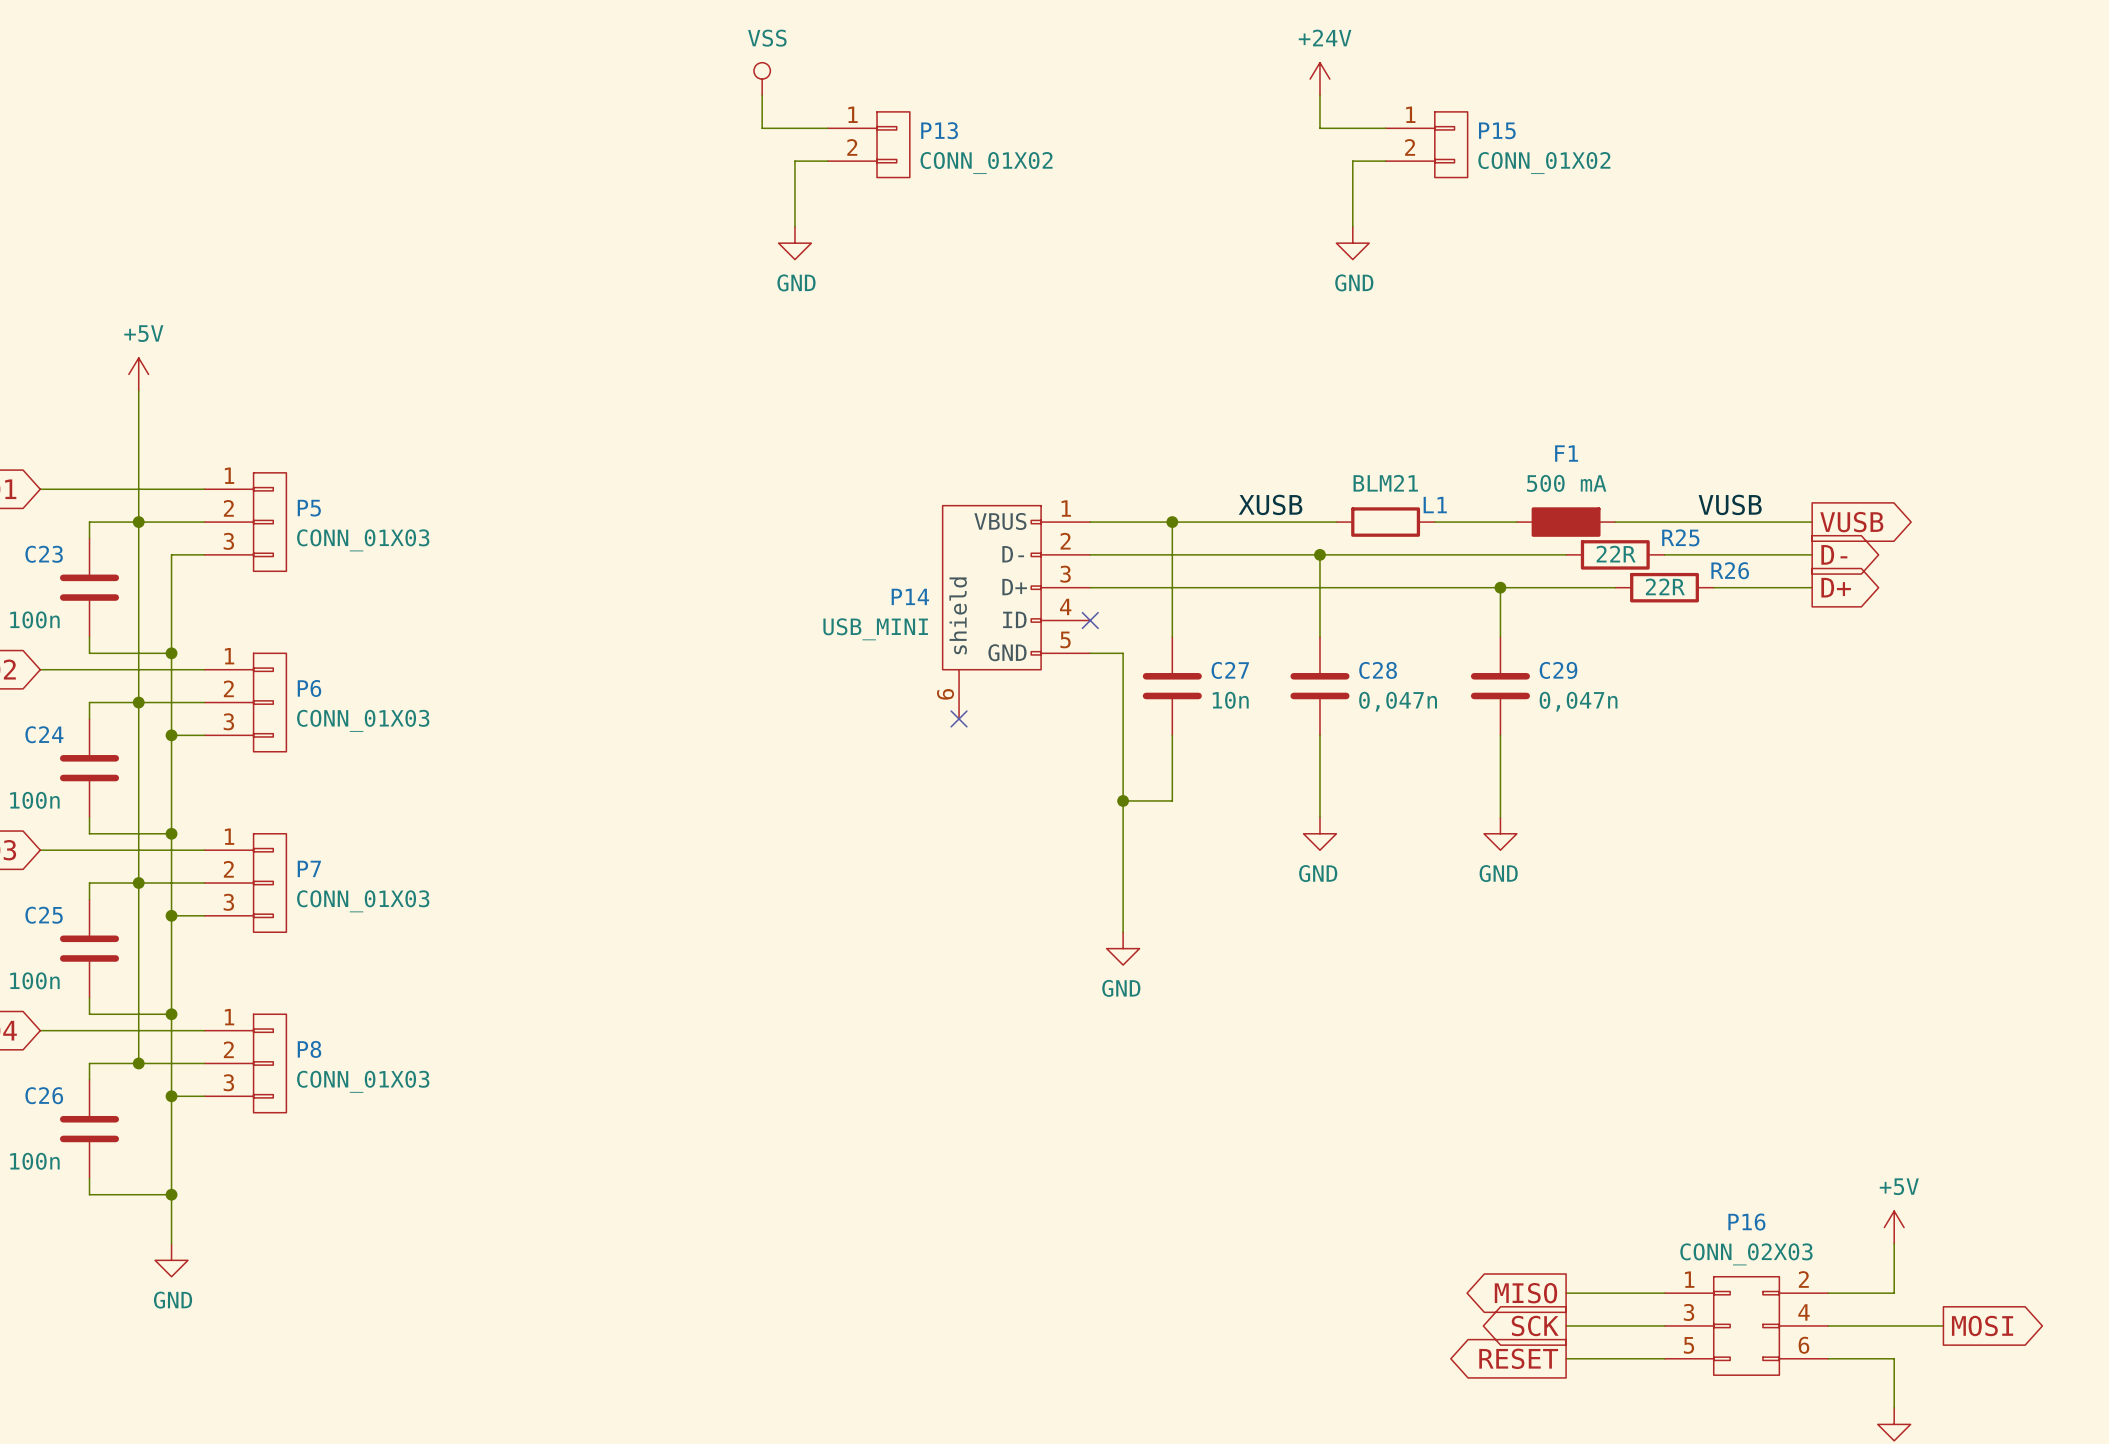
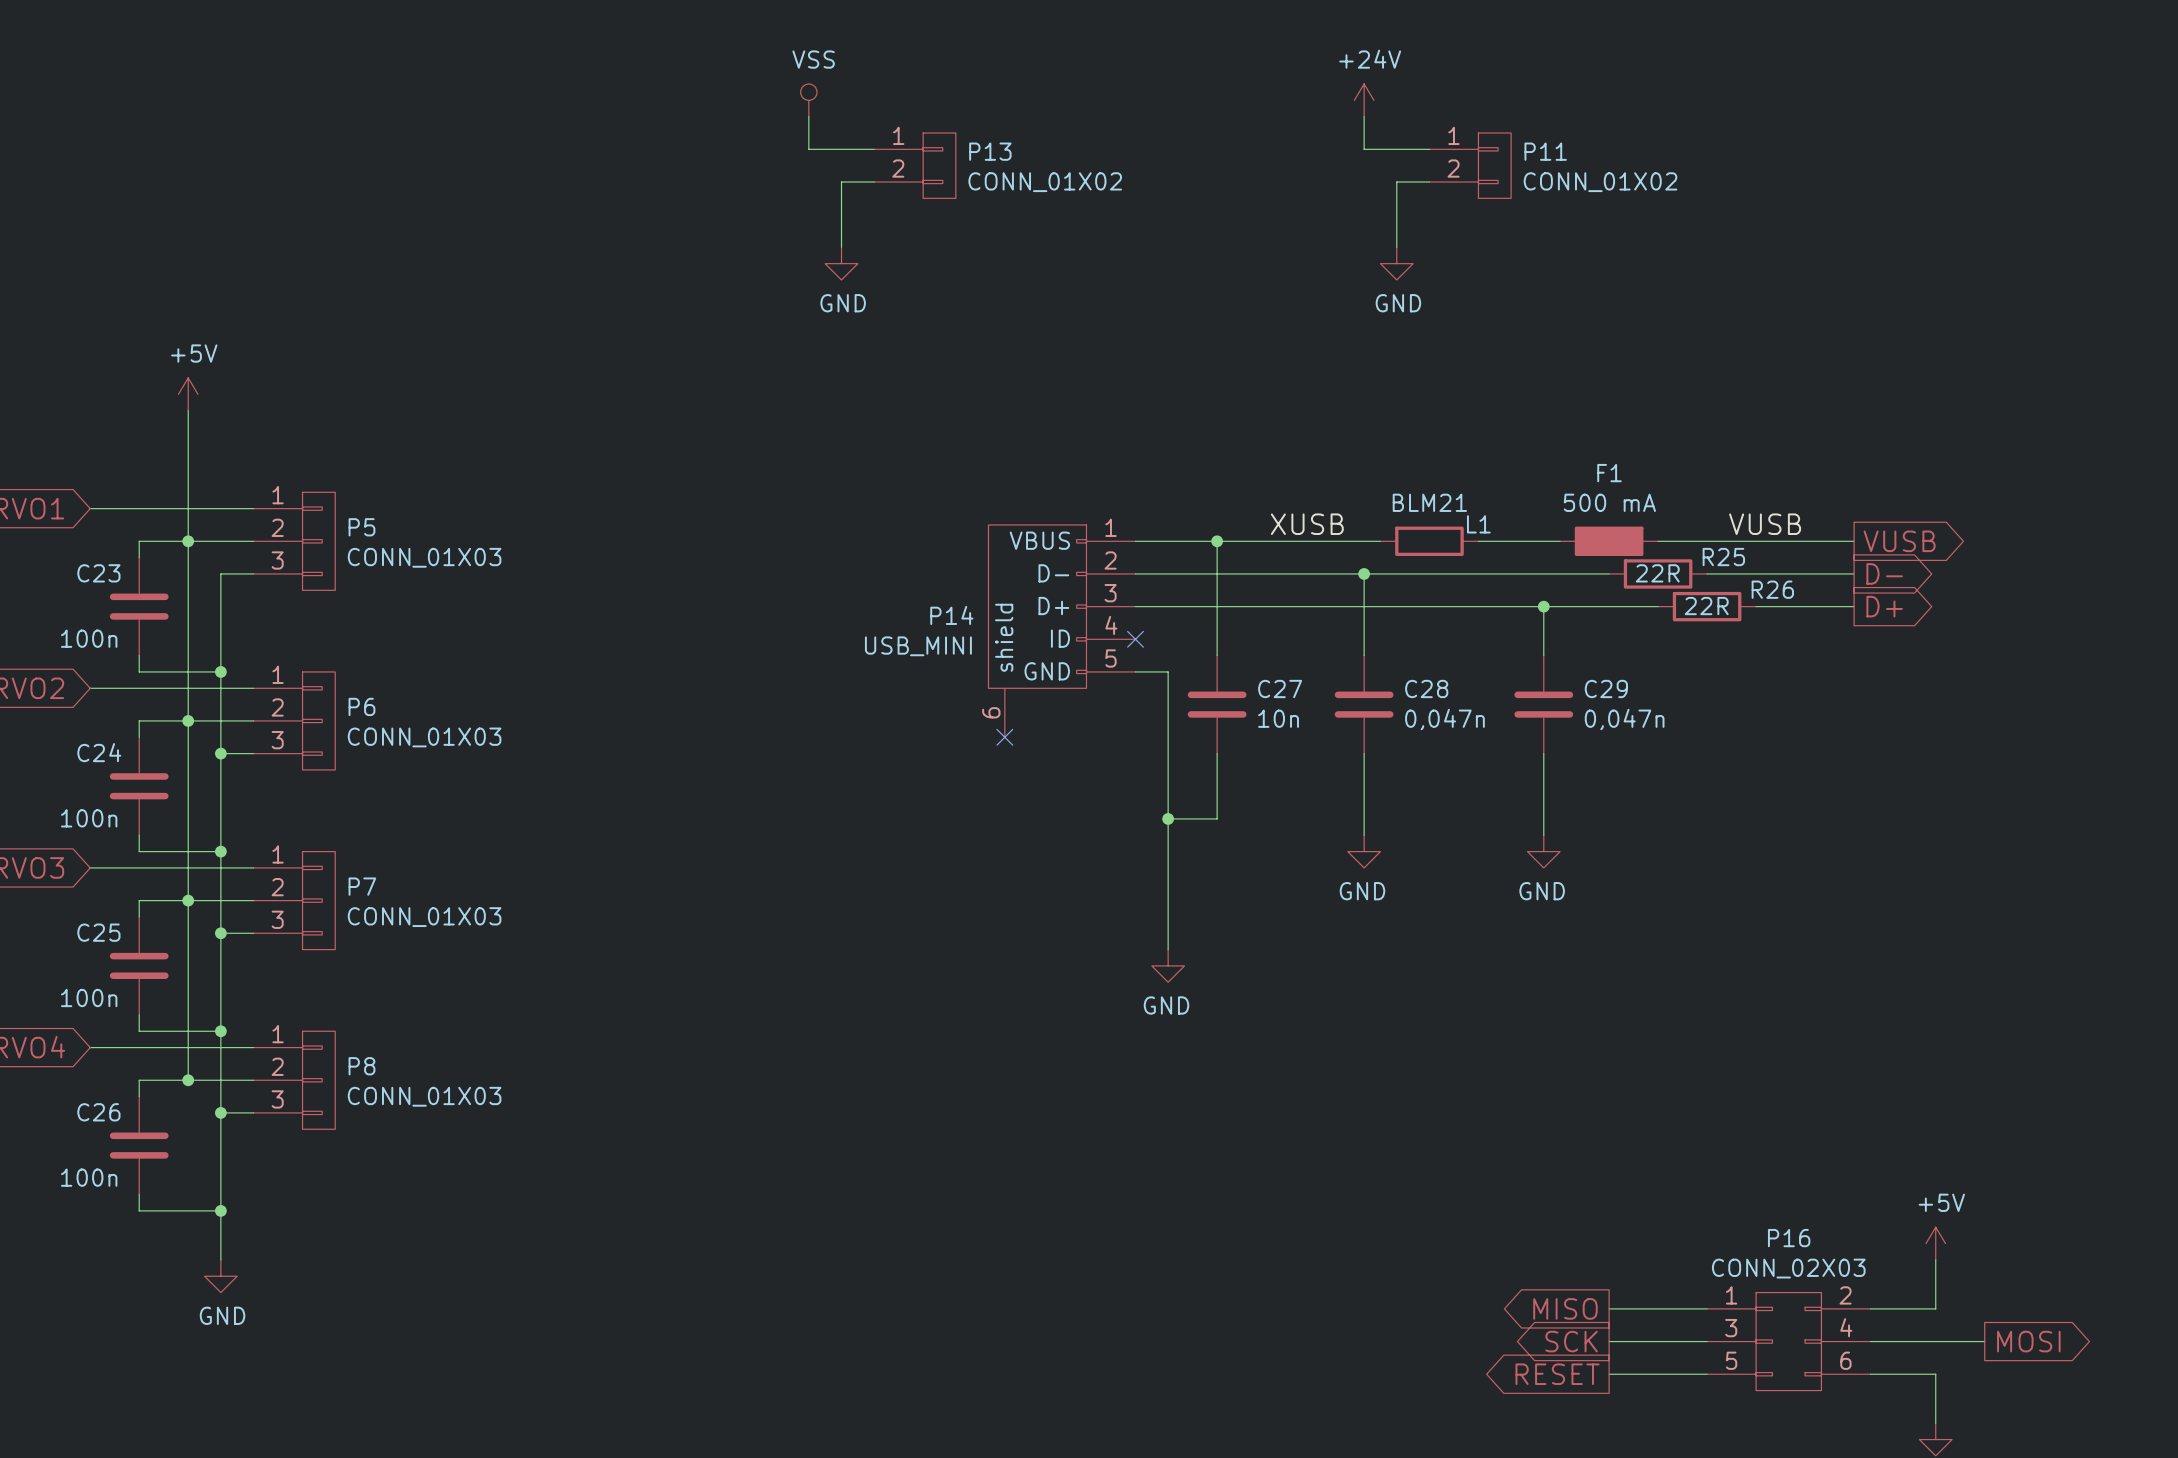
P15 name: P15 (1497, 130) -> P11 (1545, 151)

